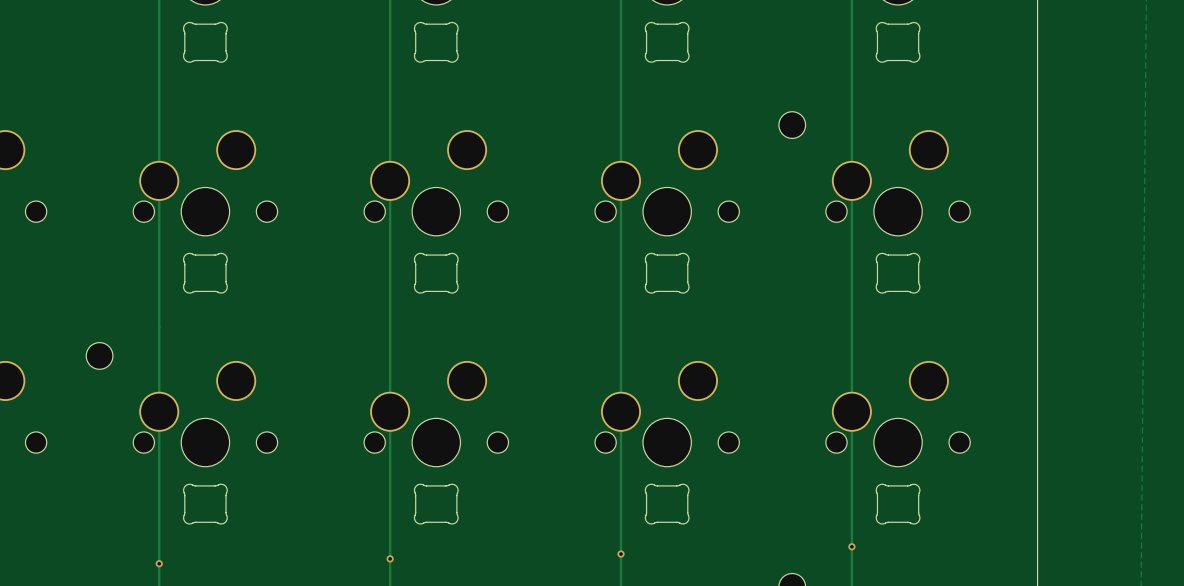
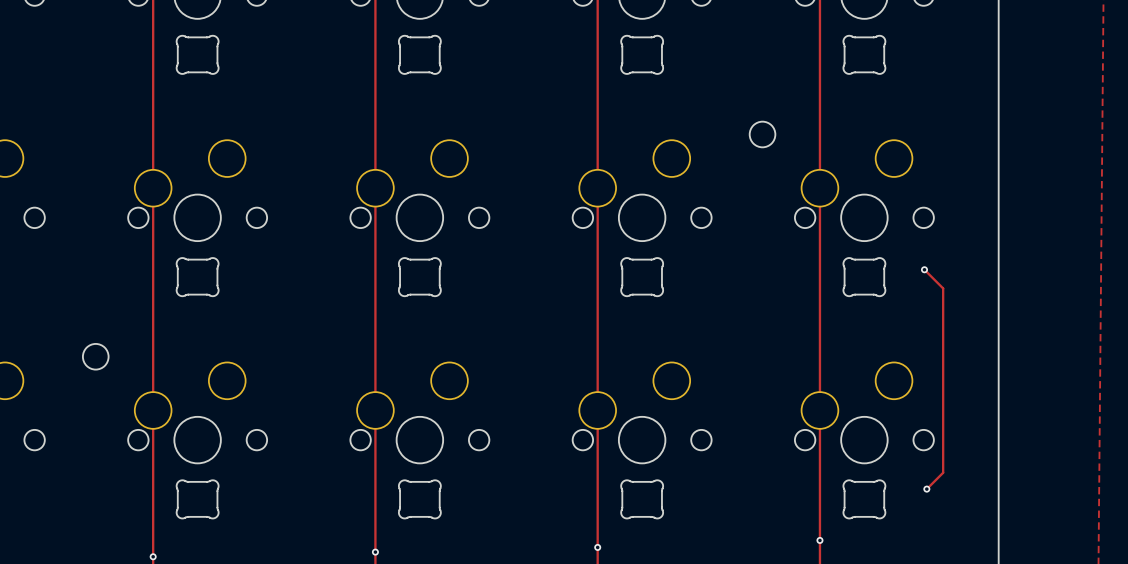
track: none -> (924, 269) (943, 288) (943, 472) (926, 489)
via: none -> (924, 269)
via: none -> (926, 489)

